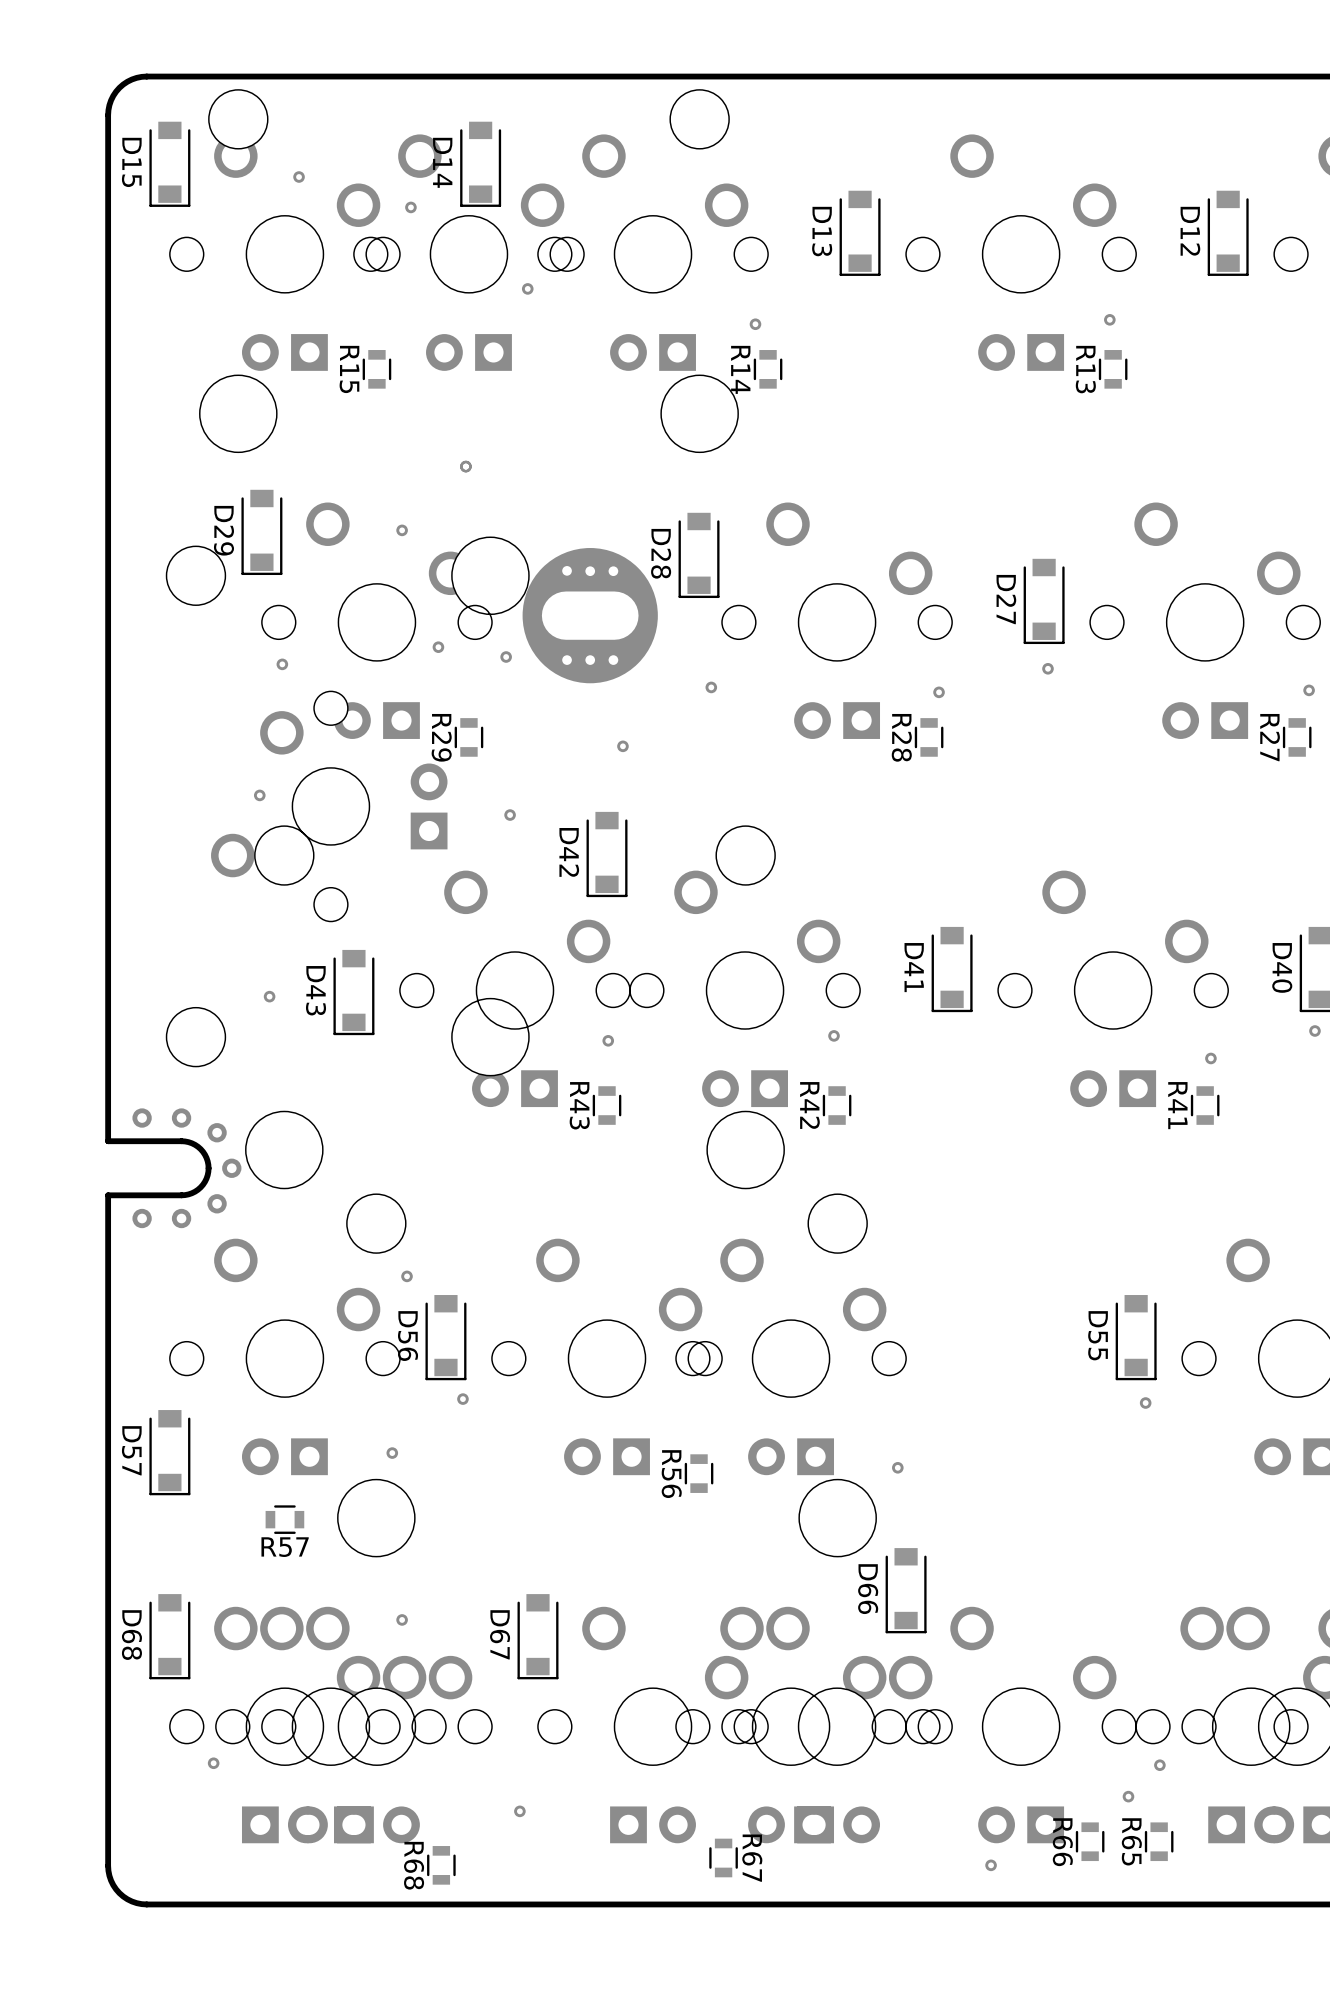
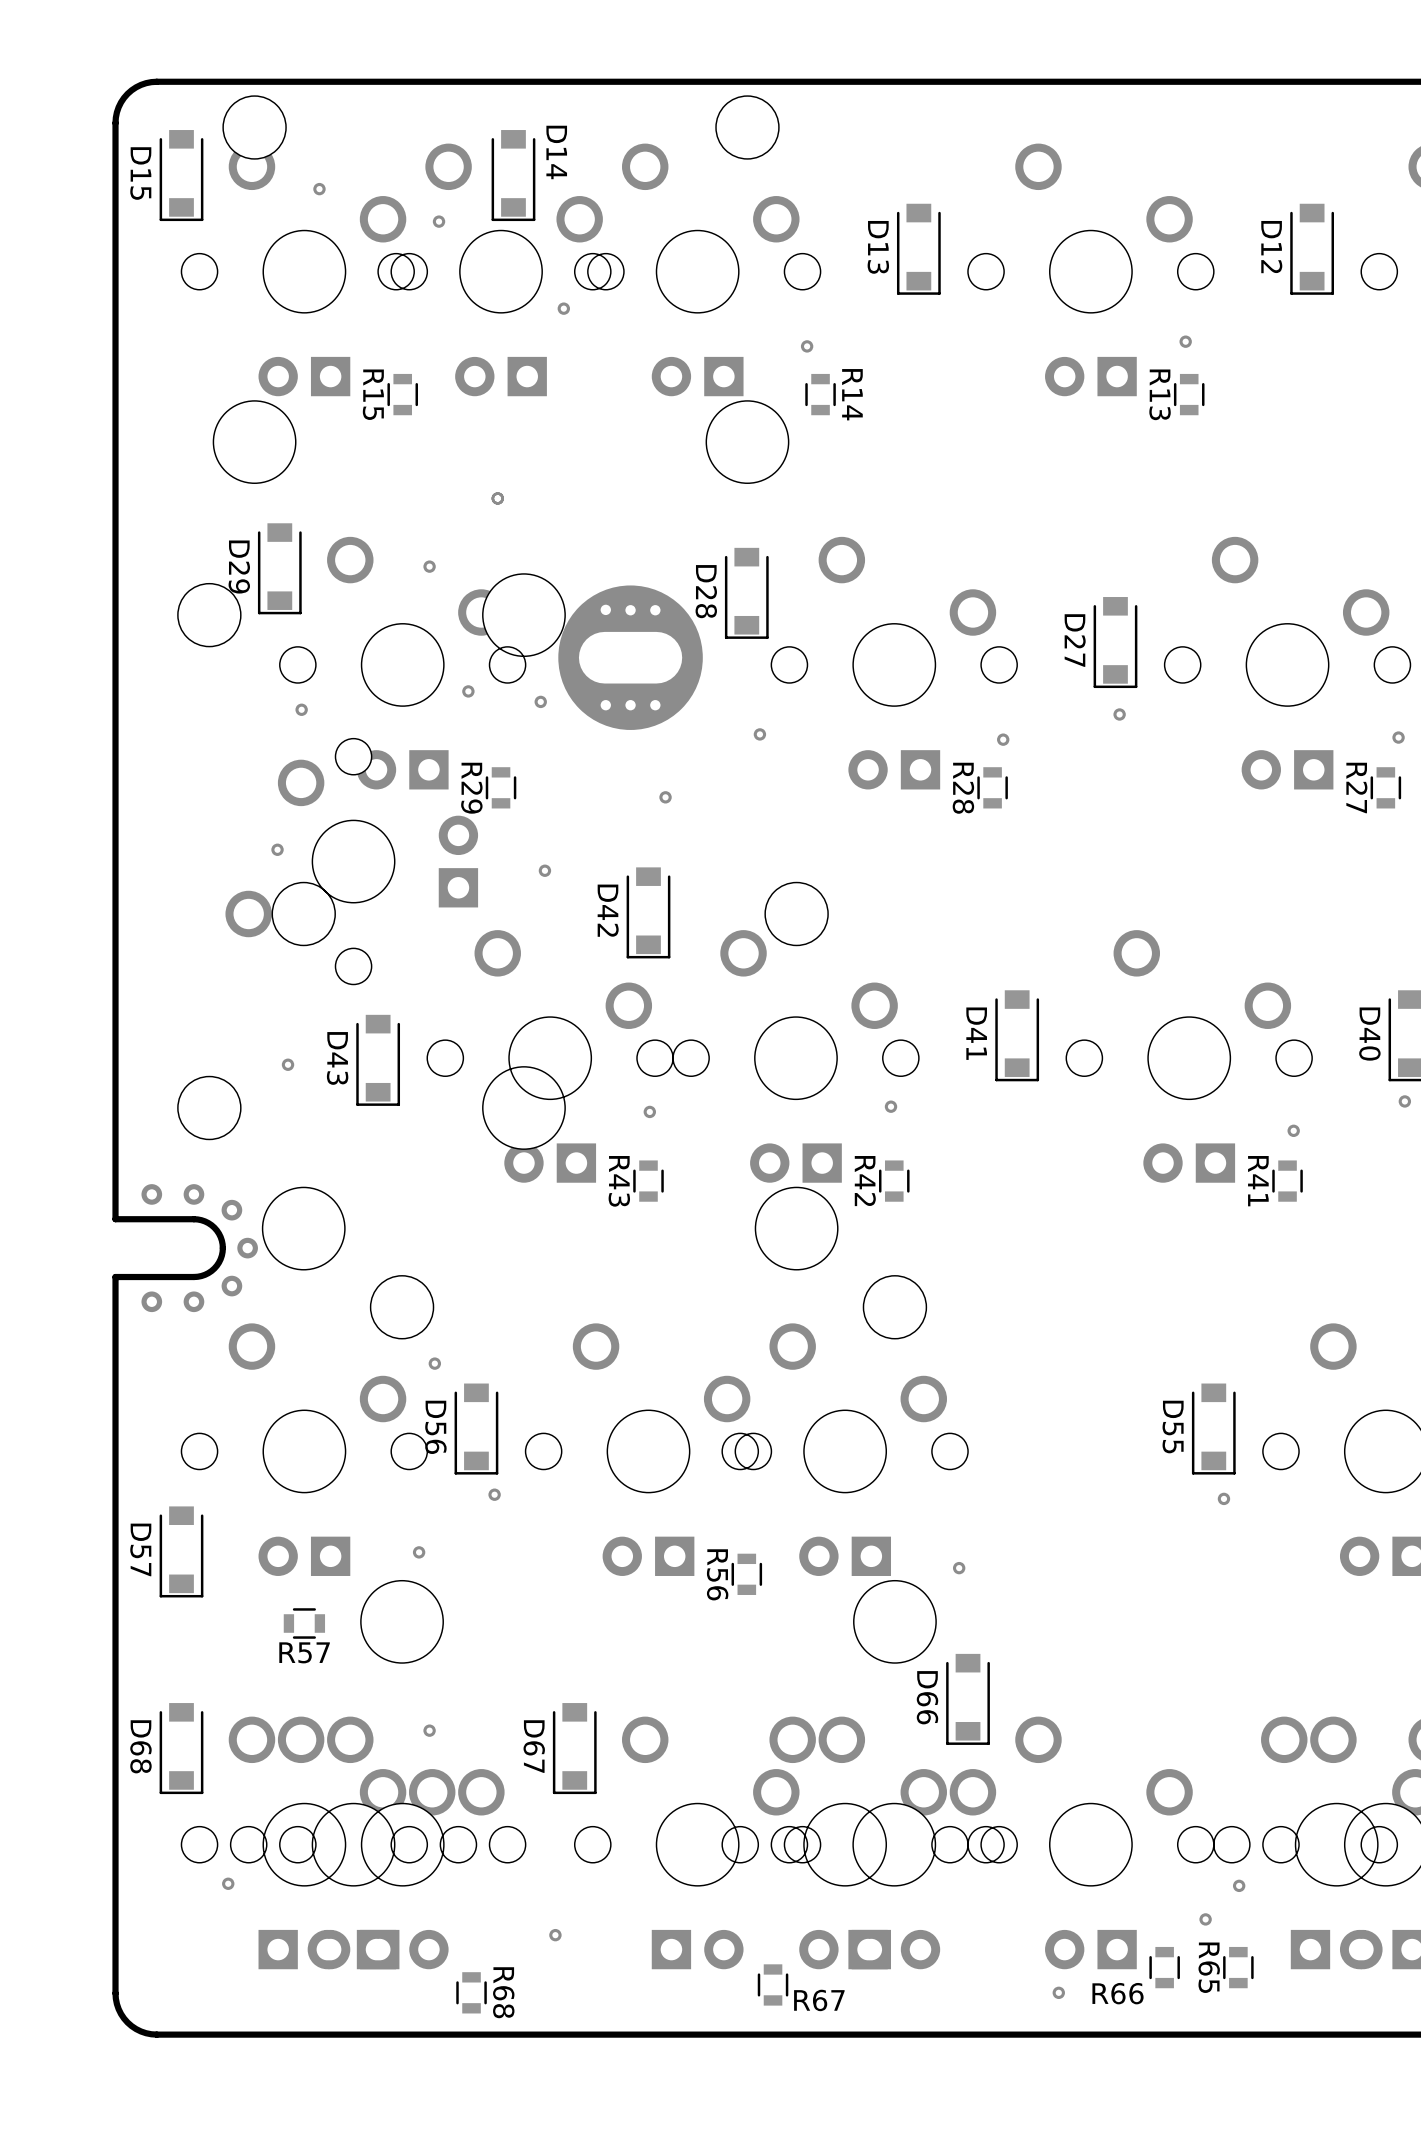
D14 name position: D14 (442, 162) -> D14 (556, 152)
R14 name position: R14 (740, 369) -> R14 (852, 394)
R66 name rotation: 0° (1062, 1842) -> 90° counterclockwise (1118, 1993)
R67 name rotation: 0° (752, 1858) -> 90° counterclockwise (819, 2000)
R68 name position: R68 (414, 1865) -> R68 (503, 1992)

